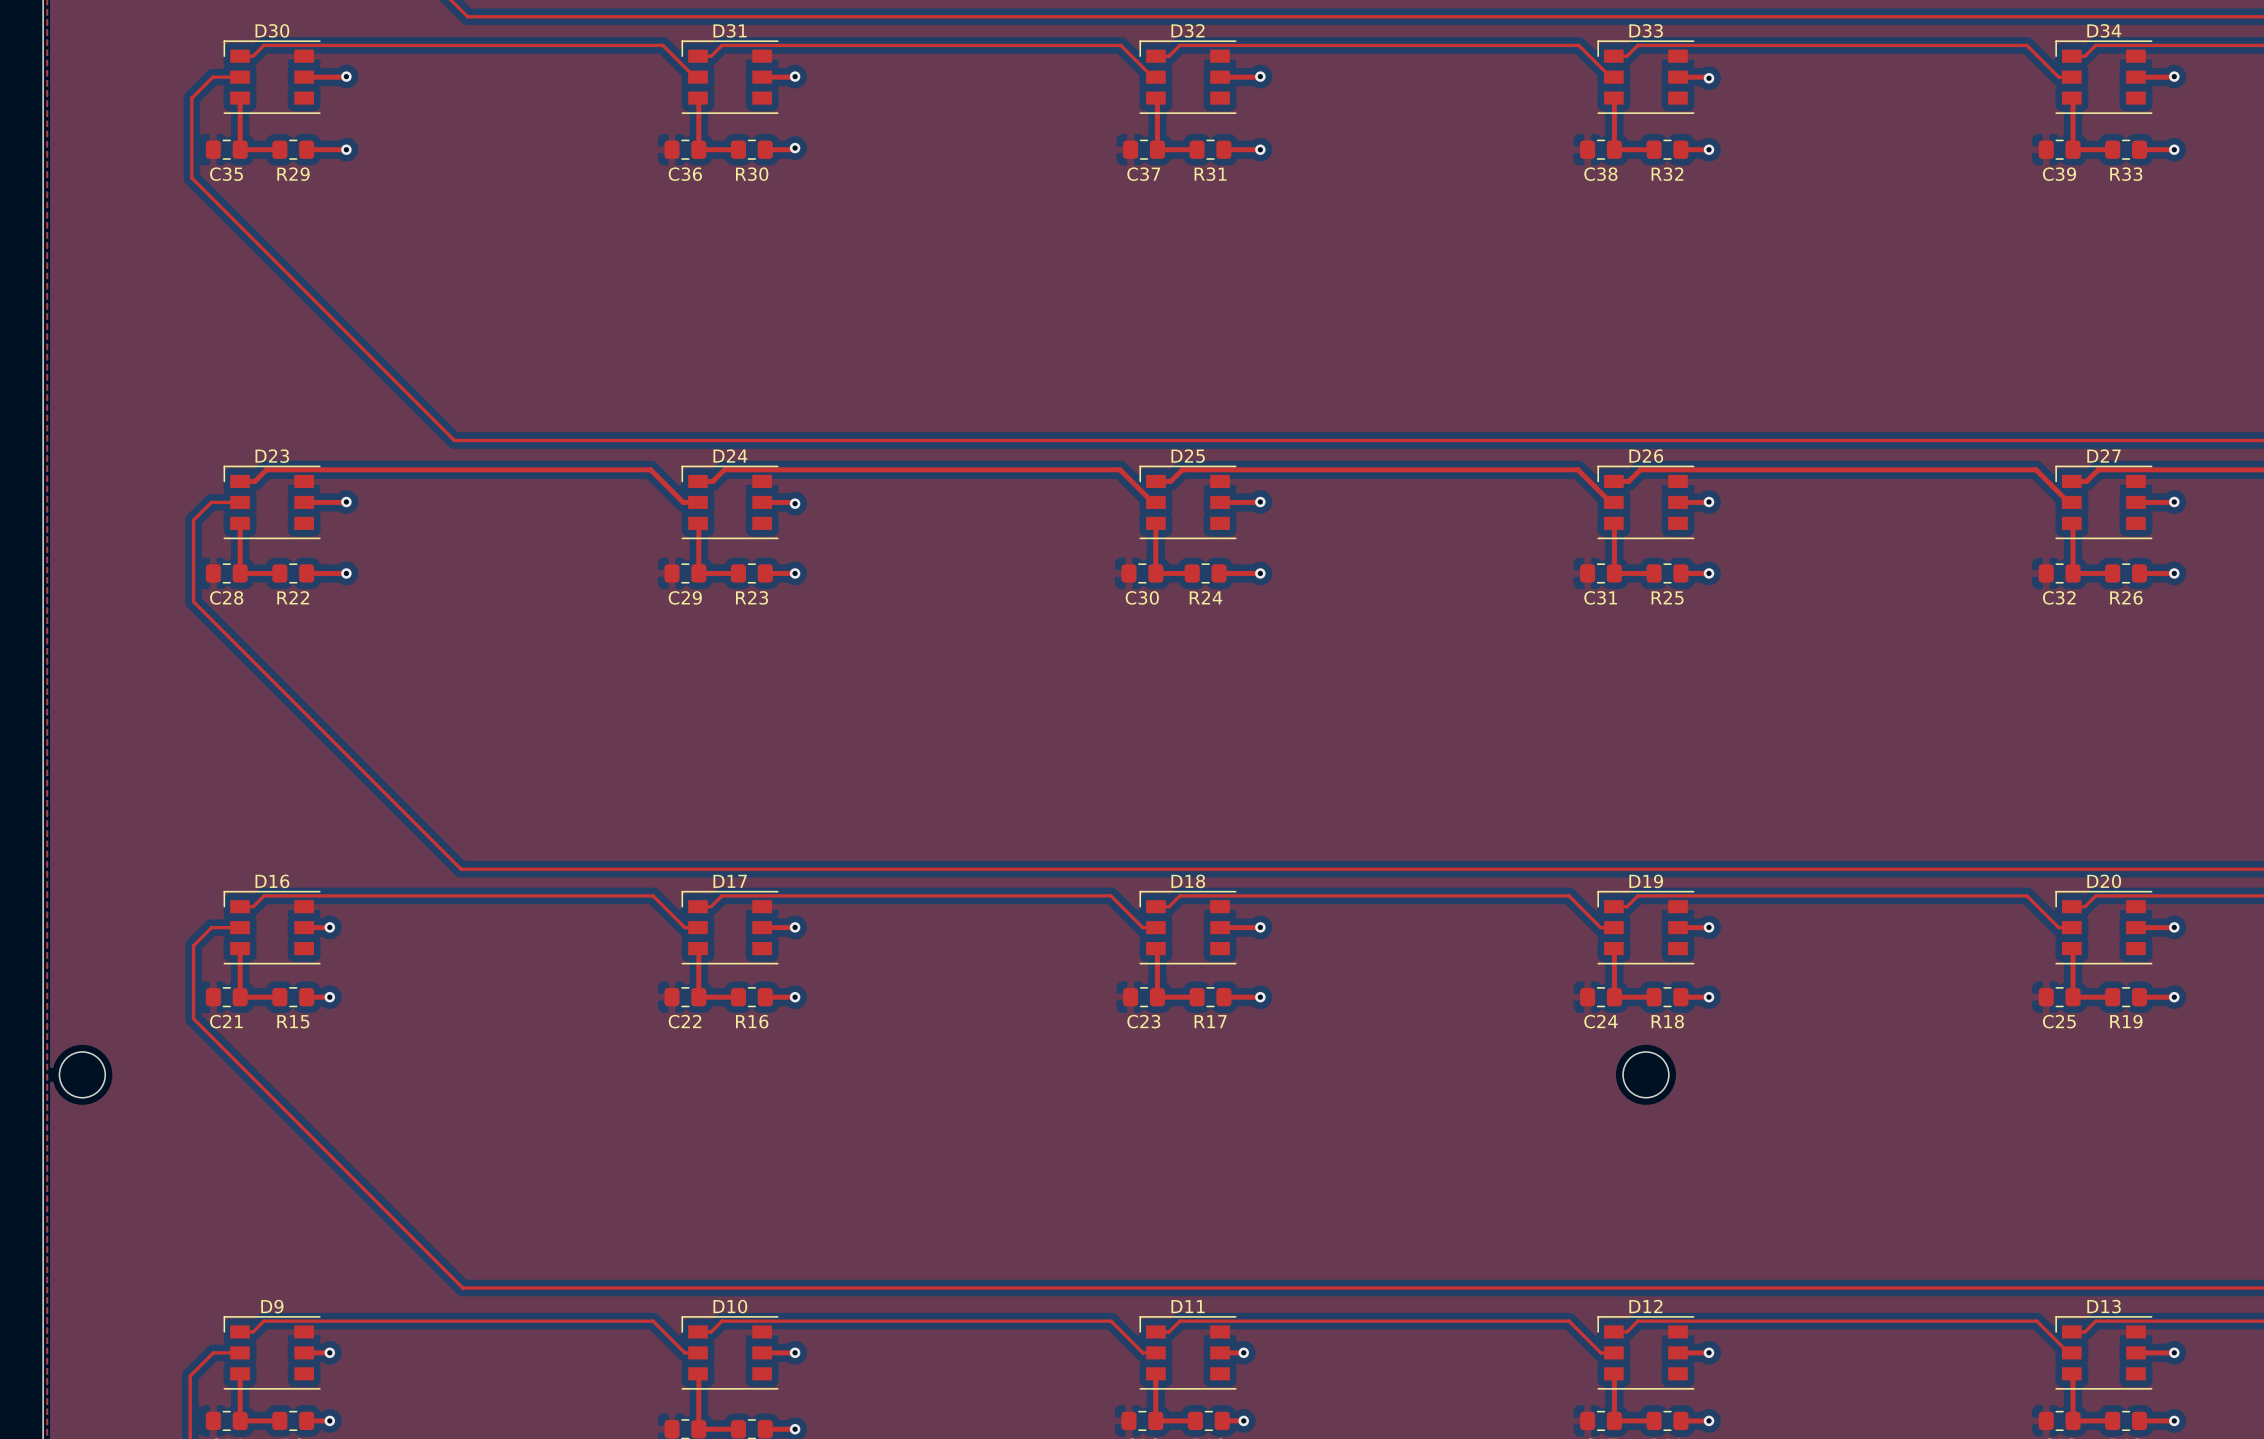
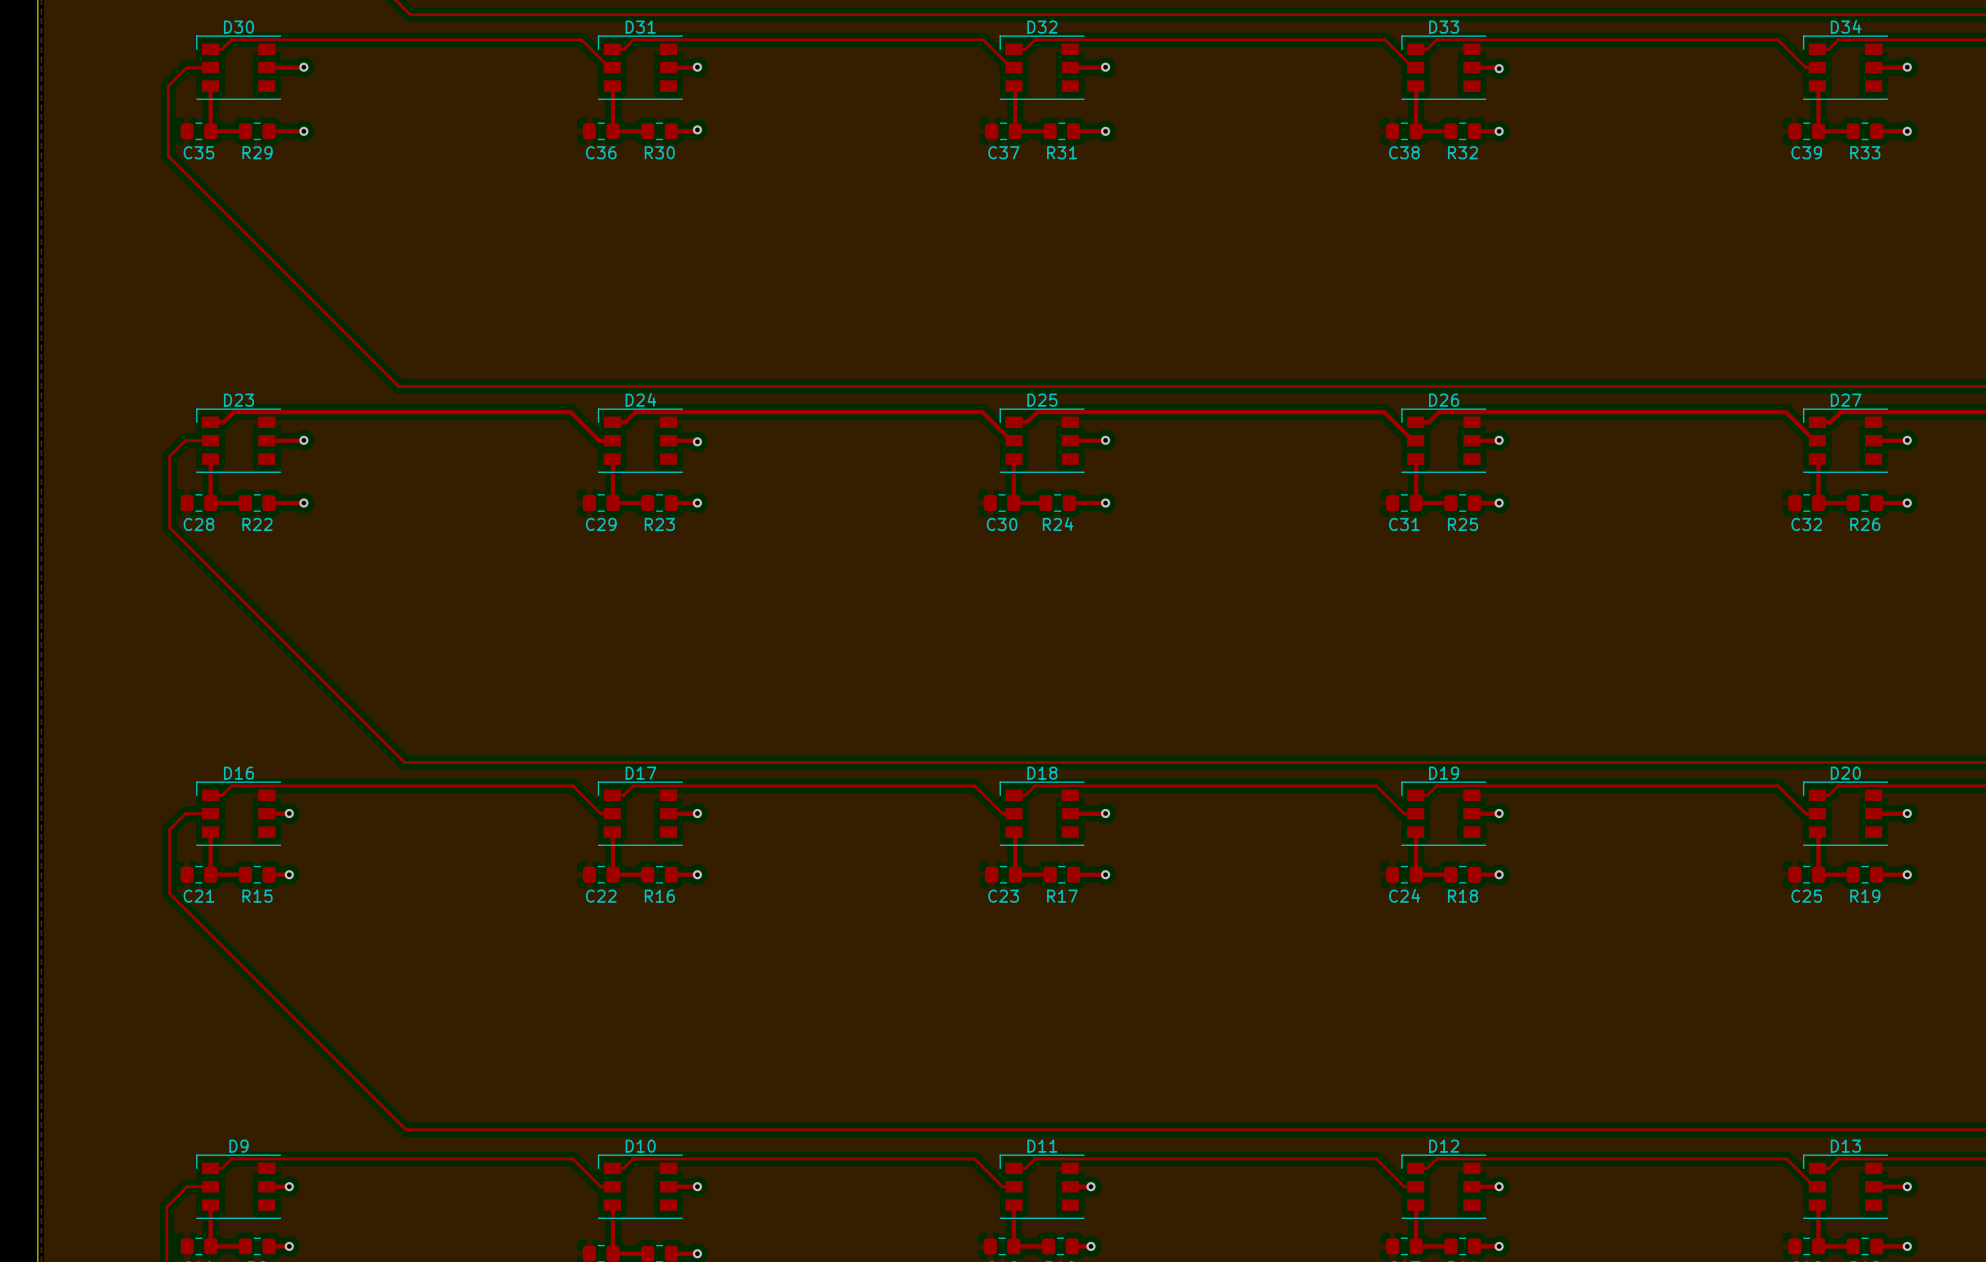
round board edge: [59, 1051, 106, 1099] -> none
round board edge: [1622, 1051, 1670, 1099] -> none

